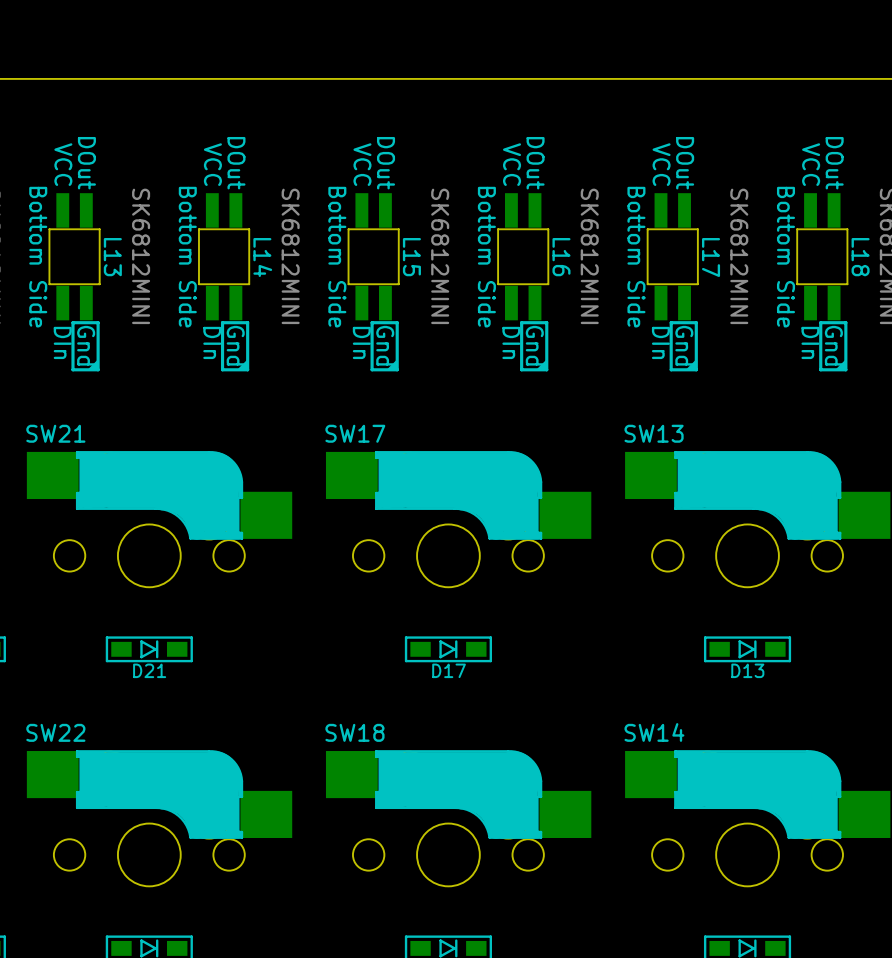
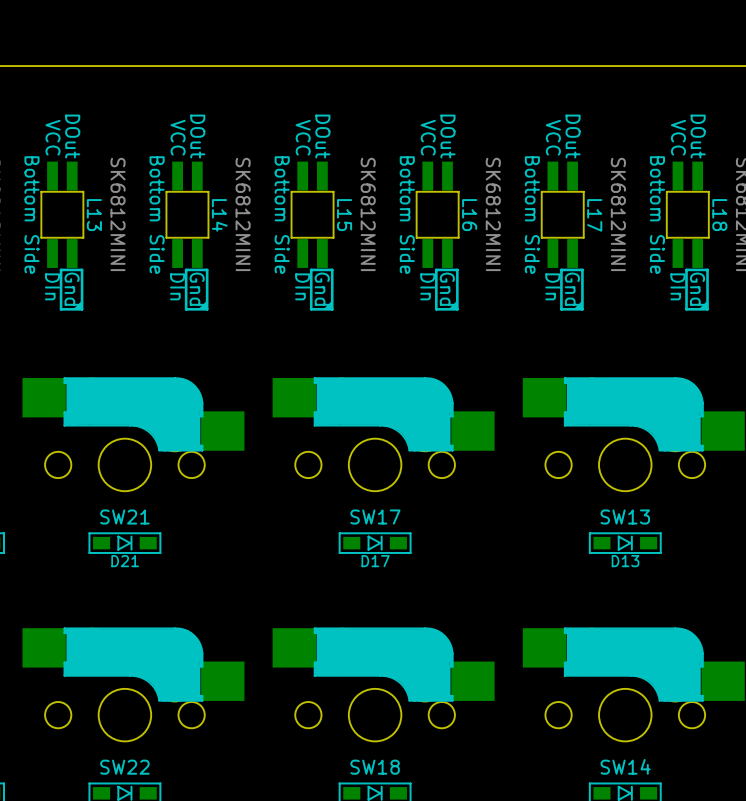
SW21 name position: SW21 (55, 433) -> SW21 (124, 516)
SW17 name position: SW17 (355, 433) -> SW17 (375, 516)
SW13 name position: SW13 (654, 433) -> SW13 (625, 516)
SW22 name position: SW22 (55, 732) -> SW22 (124, 767)
SW18 name position: SW18 (354, 732) -> SW18 (375, 767)
SW14 name position: SW14 (654, 732) -> SW14 (625, 766)

